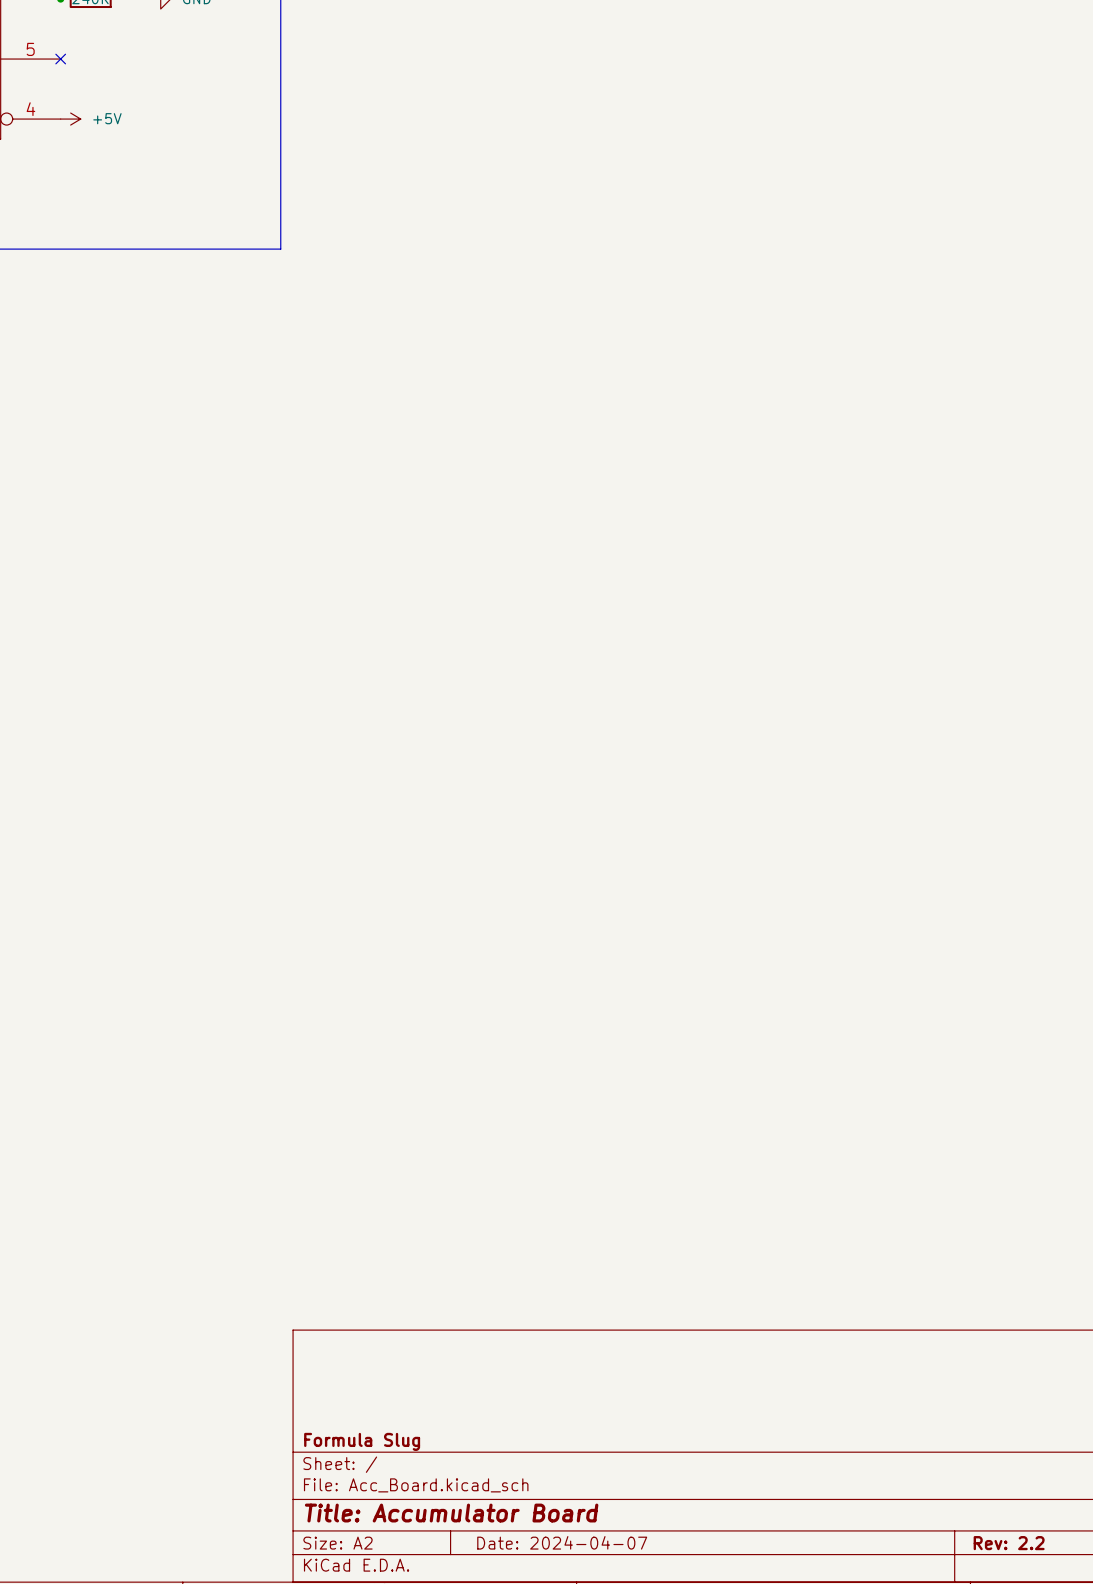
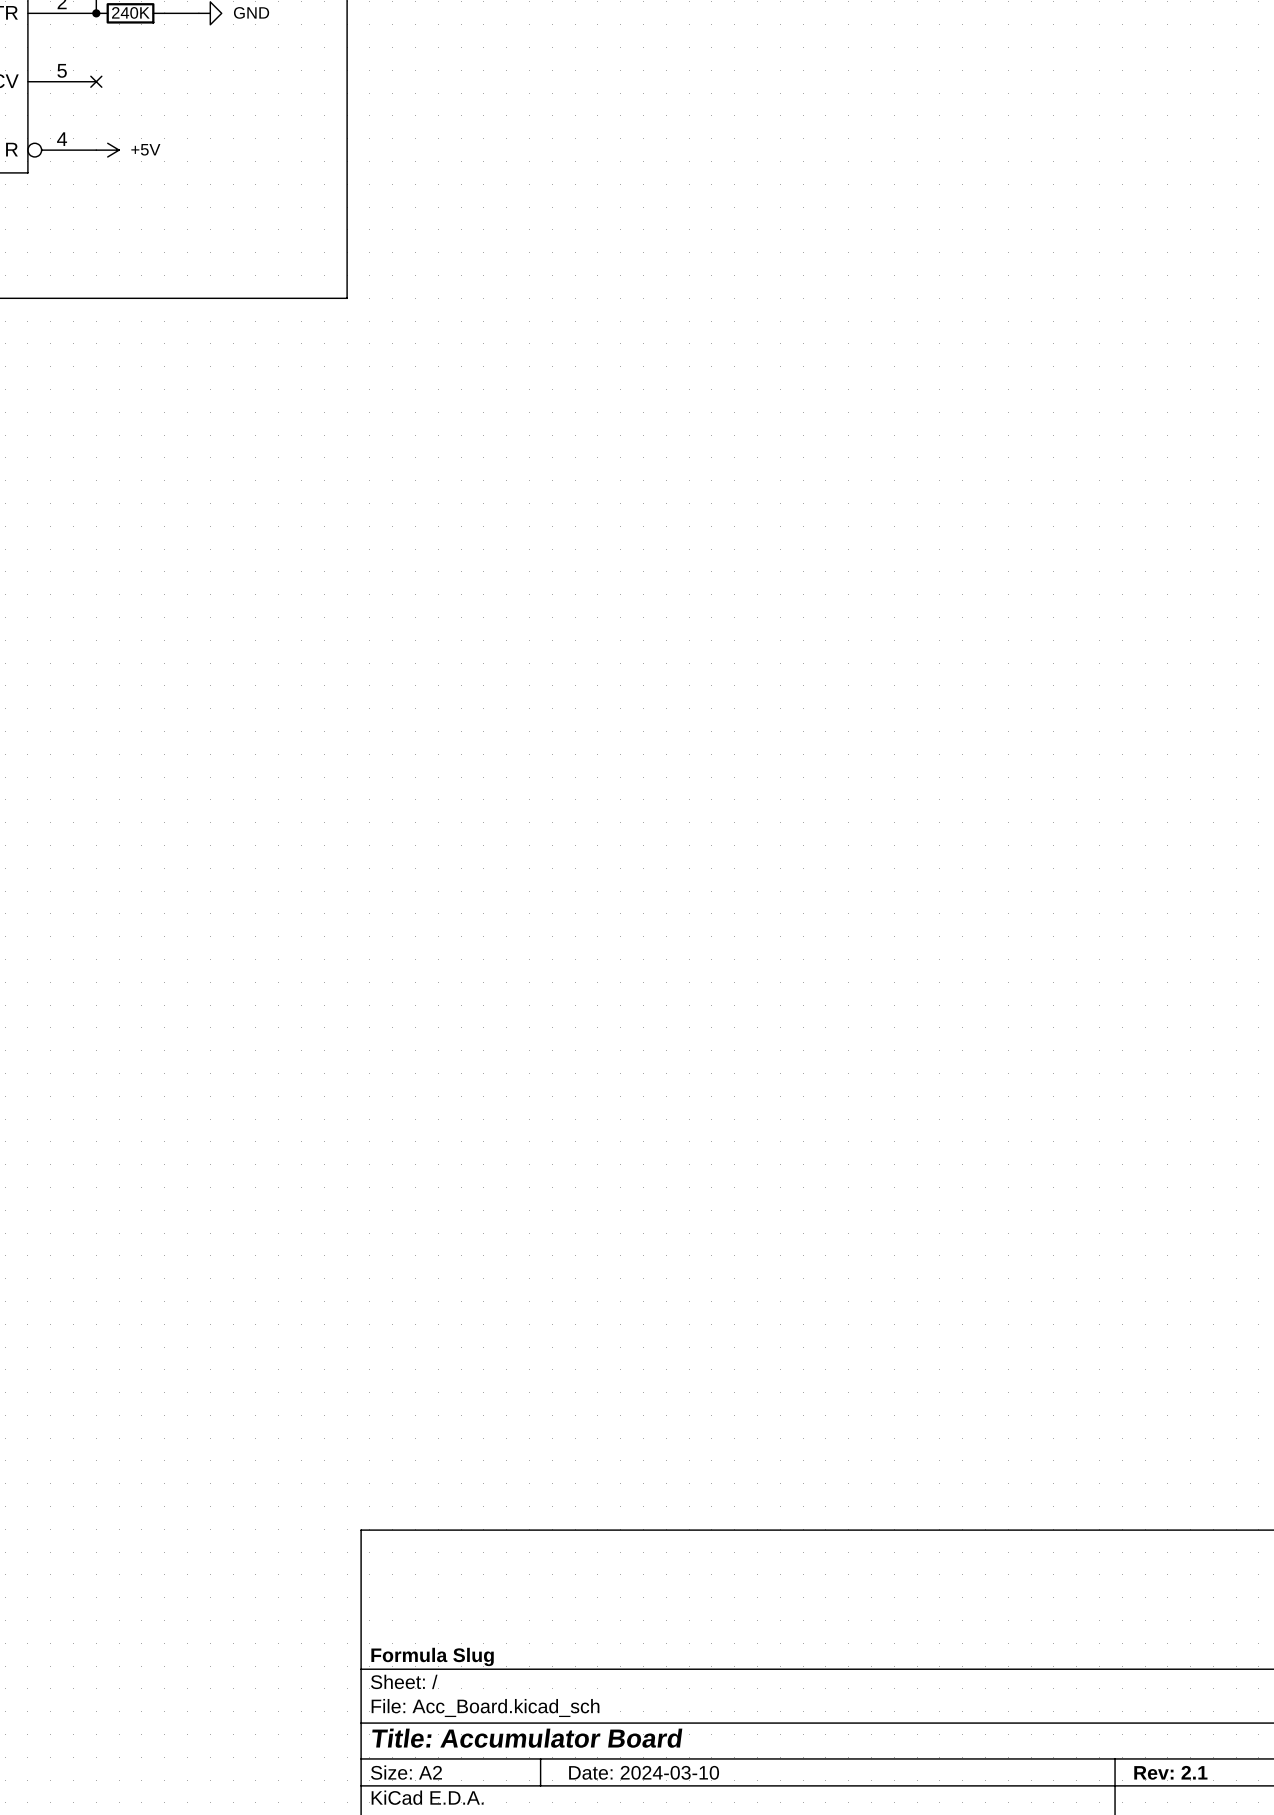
title block: Date: 2024-04-07 (562, 1542) -> Date: 2024-03-10 (644, 1772)
title block: Rev: 2.2 (1009, 1543) -> Rev: 2.1 (1170, 1772)

